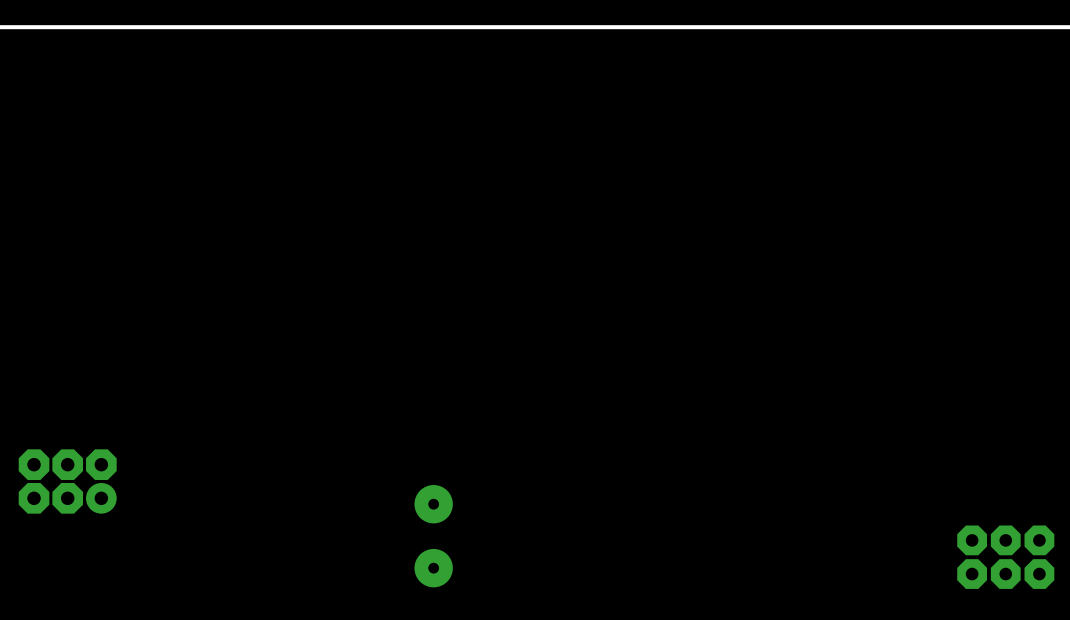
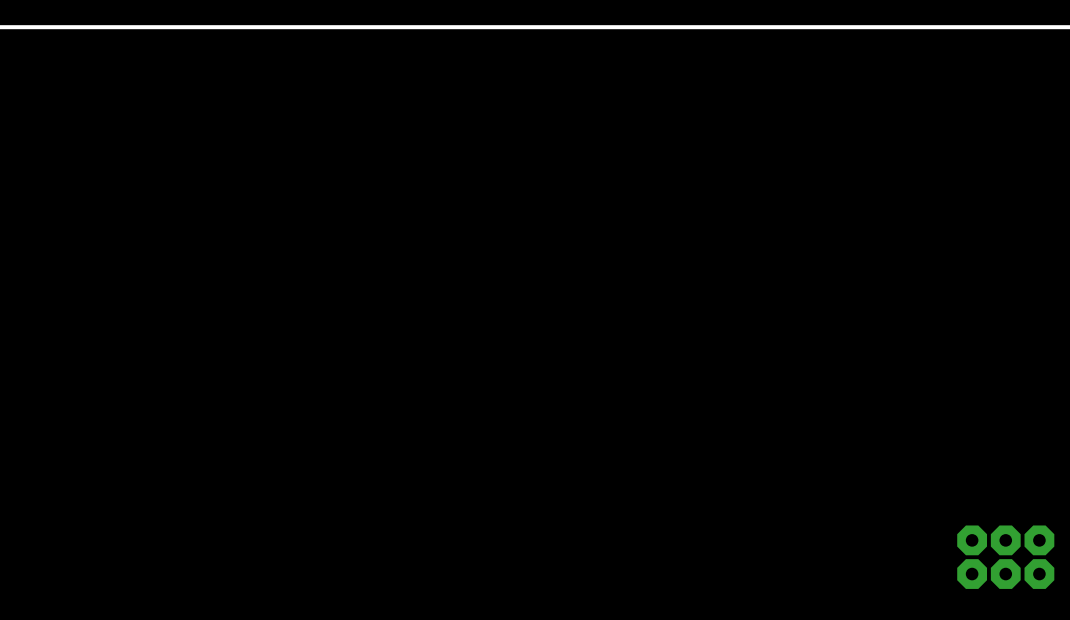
part: (67, 481) -> none
part: (433, 536) -> none

